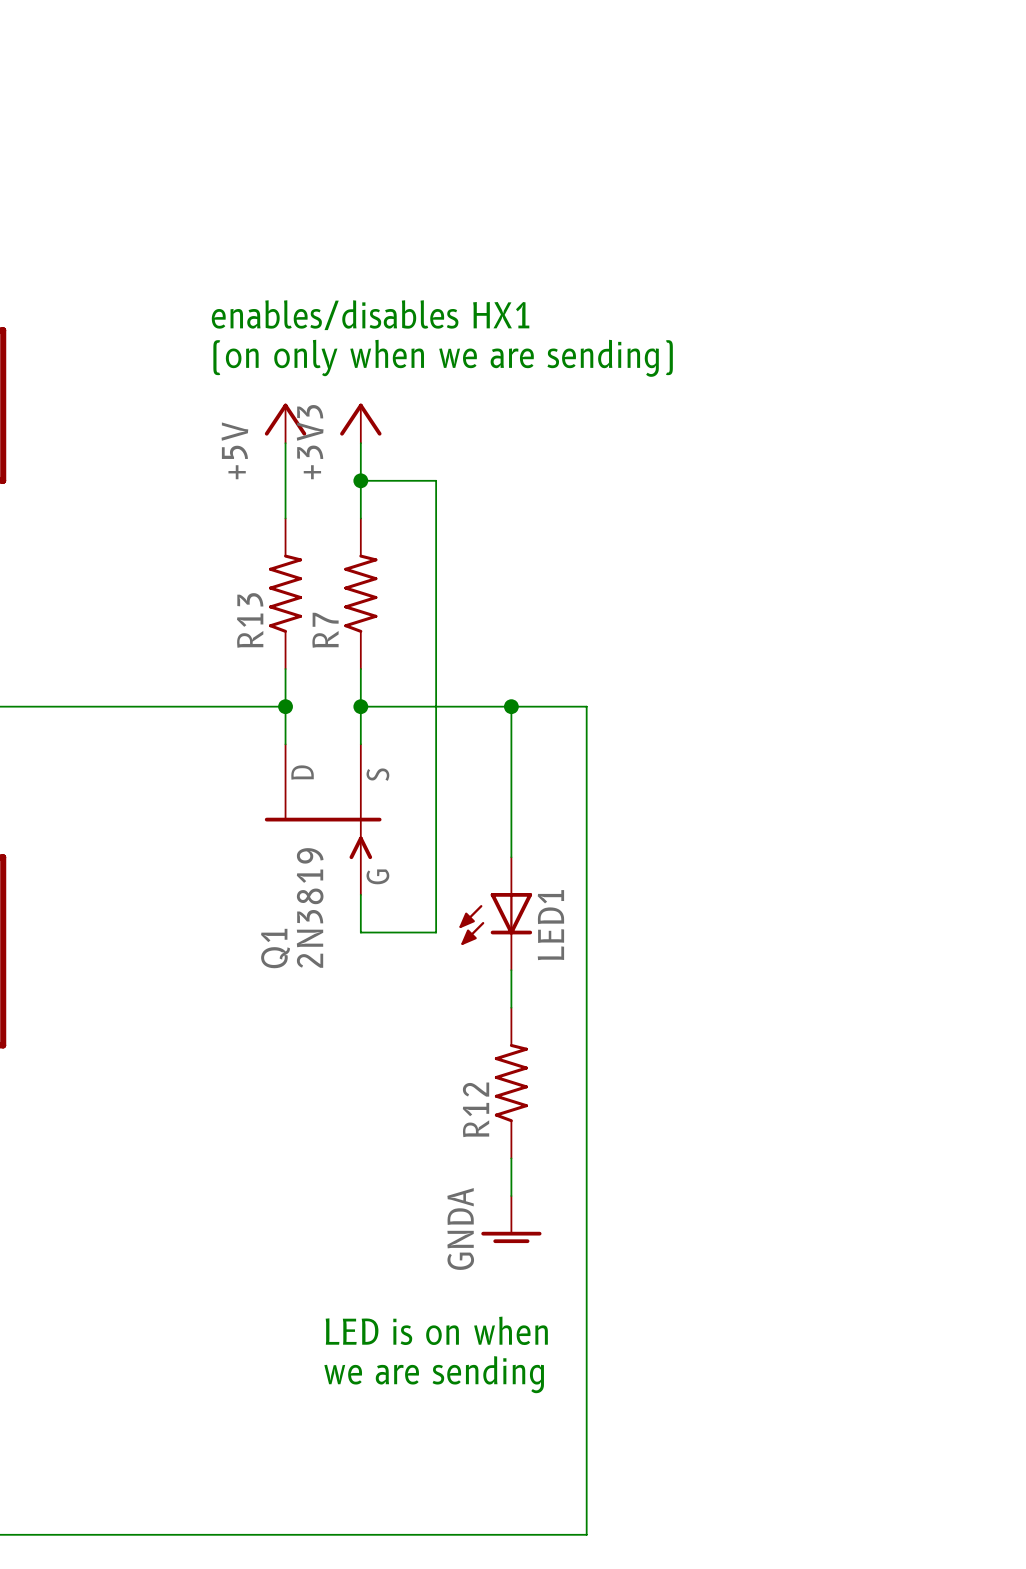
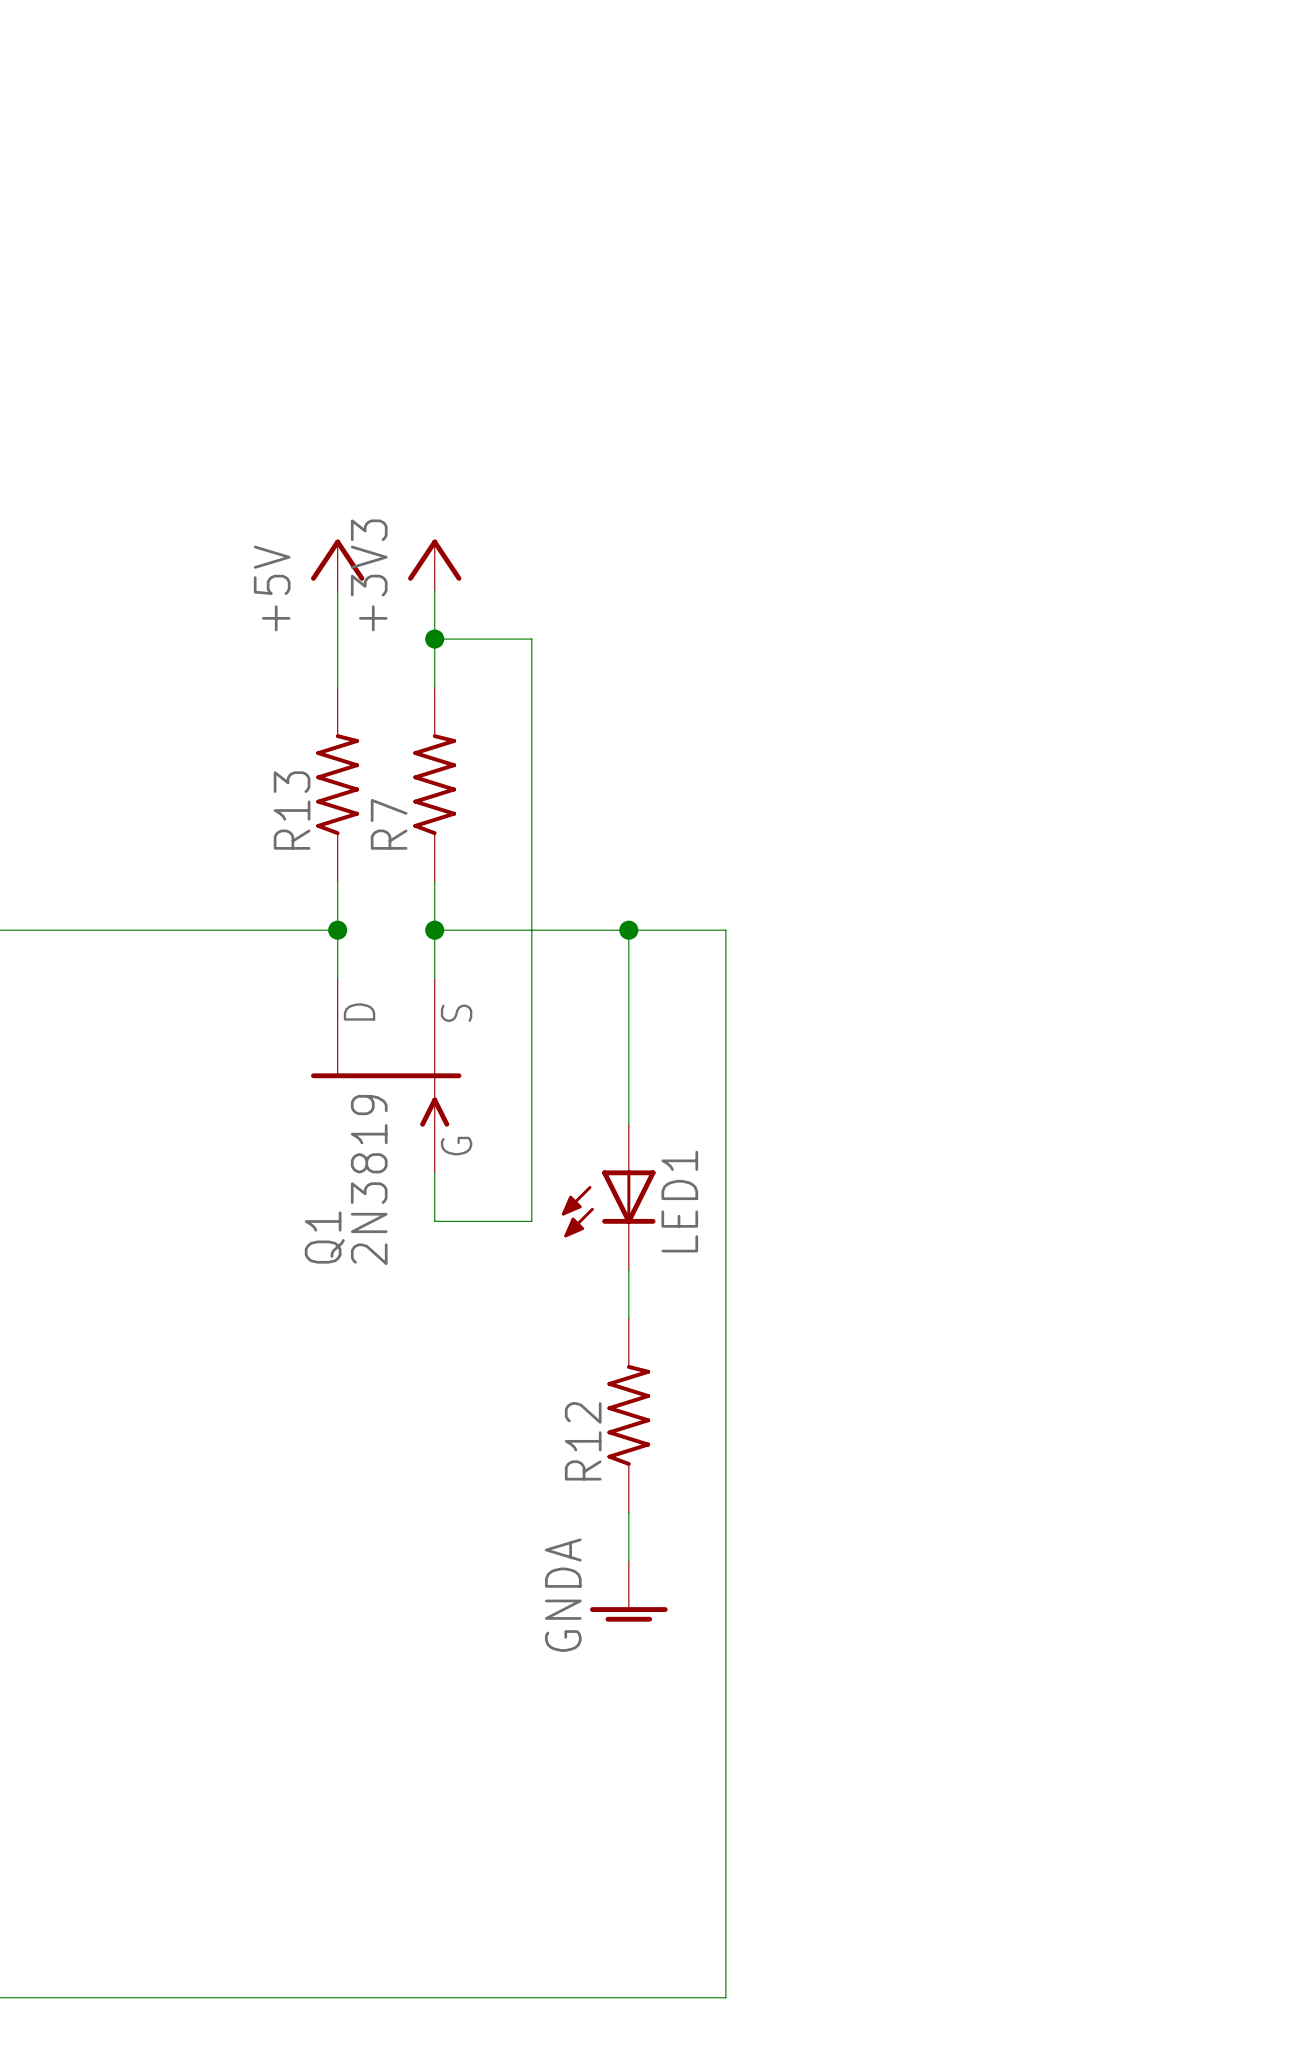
text: enables/disables HX1 (370, 315) -> none
text: (on only when we are sending) (443, 358) -> none
text: LED is on when (436, 1330) -> none
text: we are sending (434, 1374) -> none

